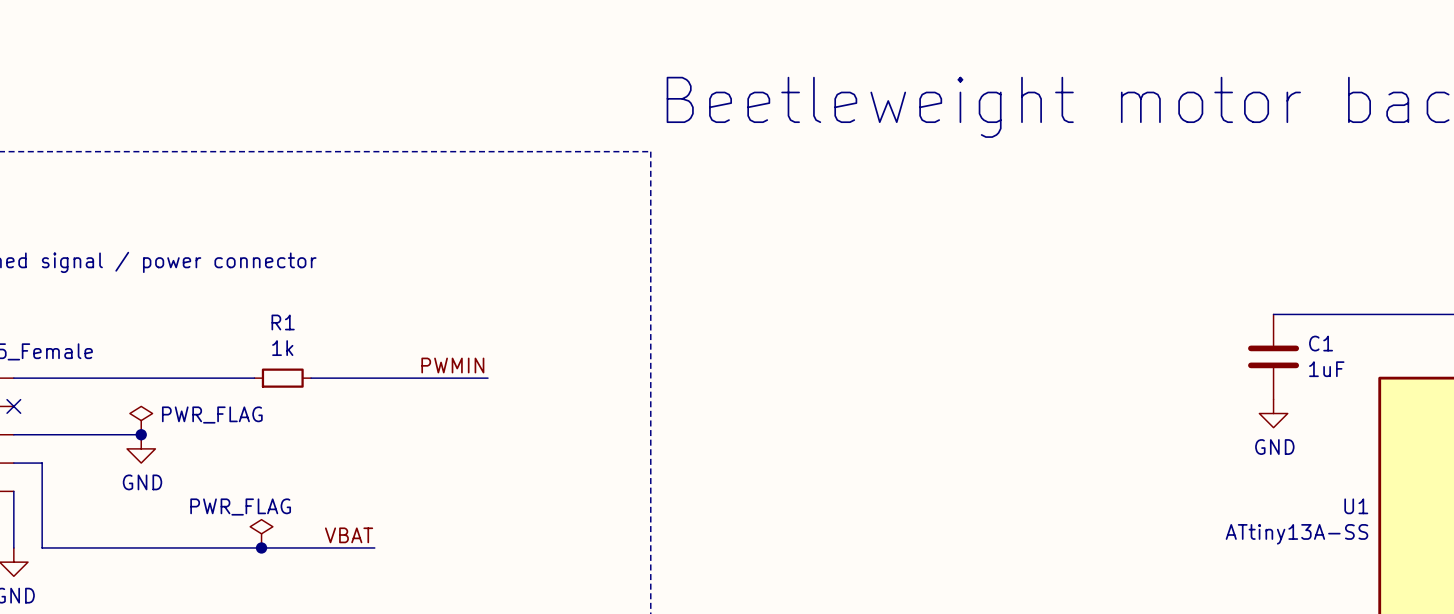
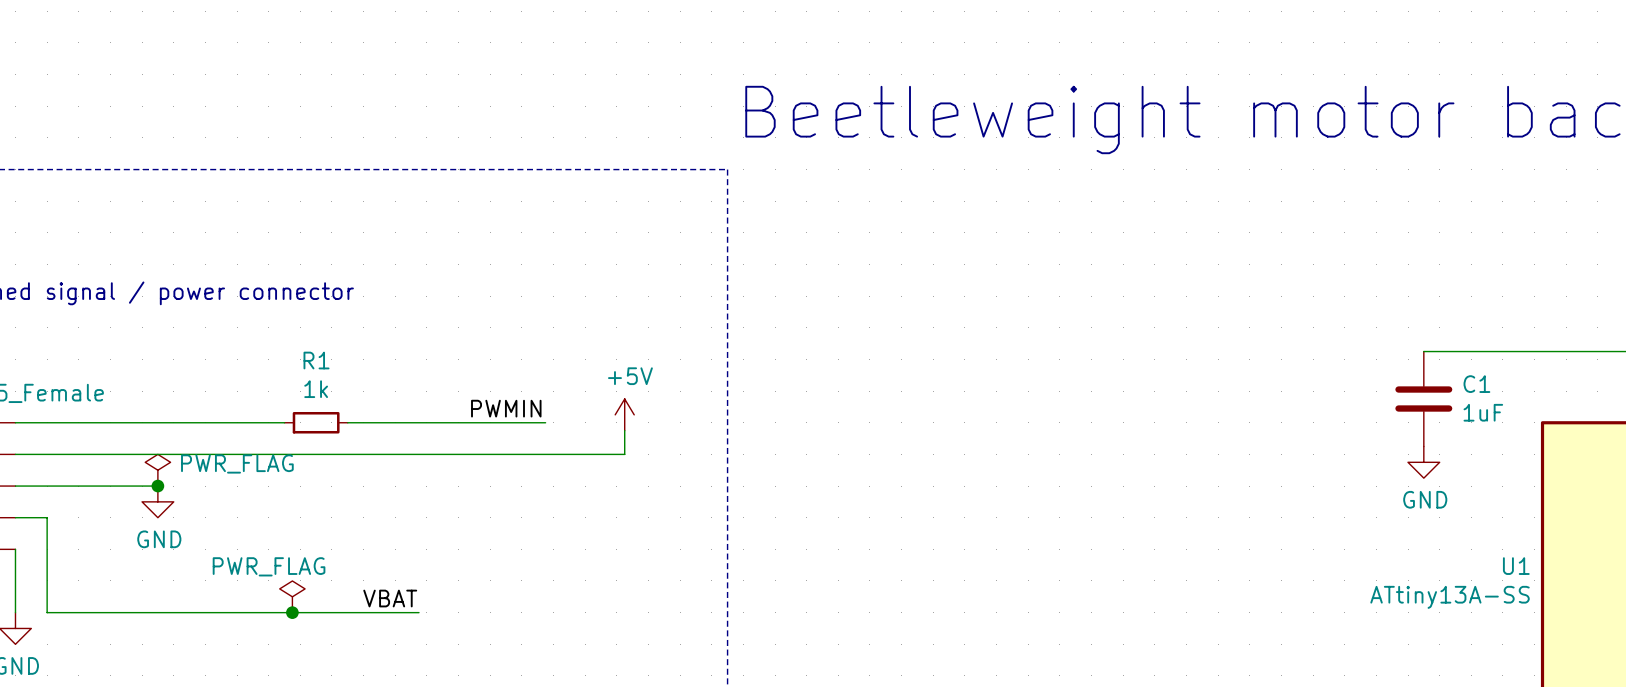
power symbol: none -> +5V (624, 414)
wire: none -> (624, 430) (624, 454) (15, 454)
no-connect mark: (13, 406) -> none

